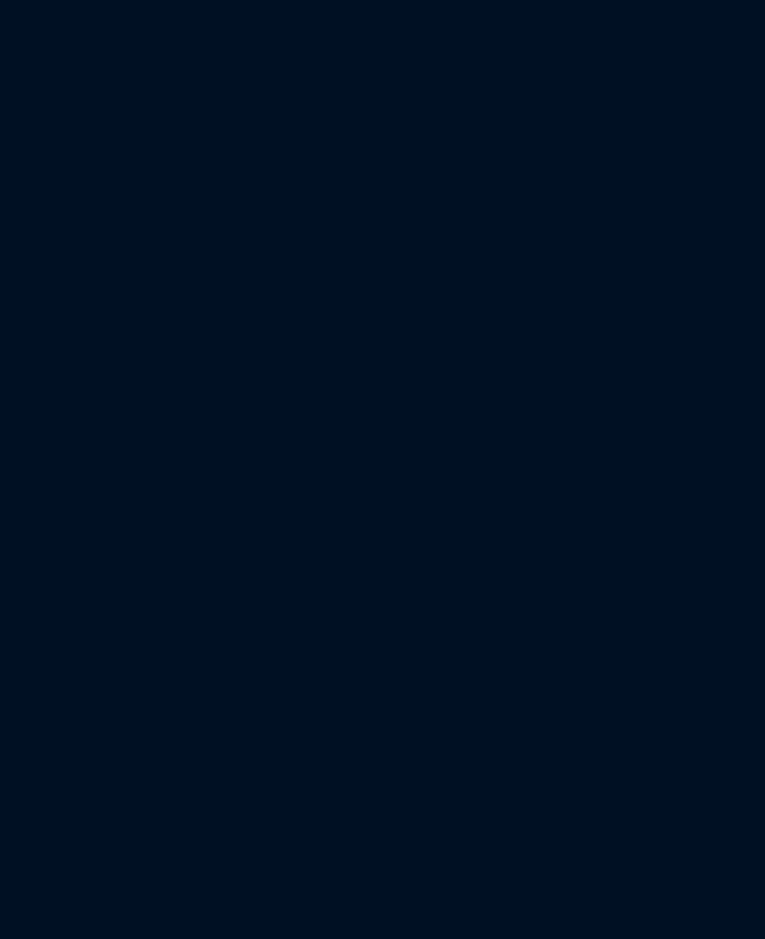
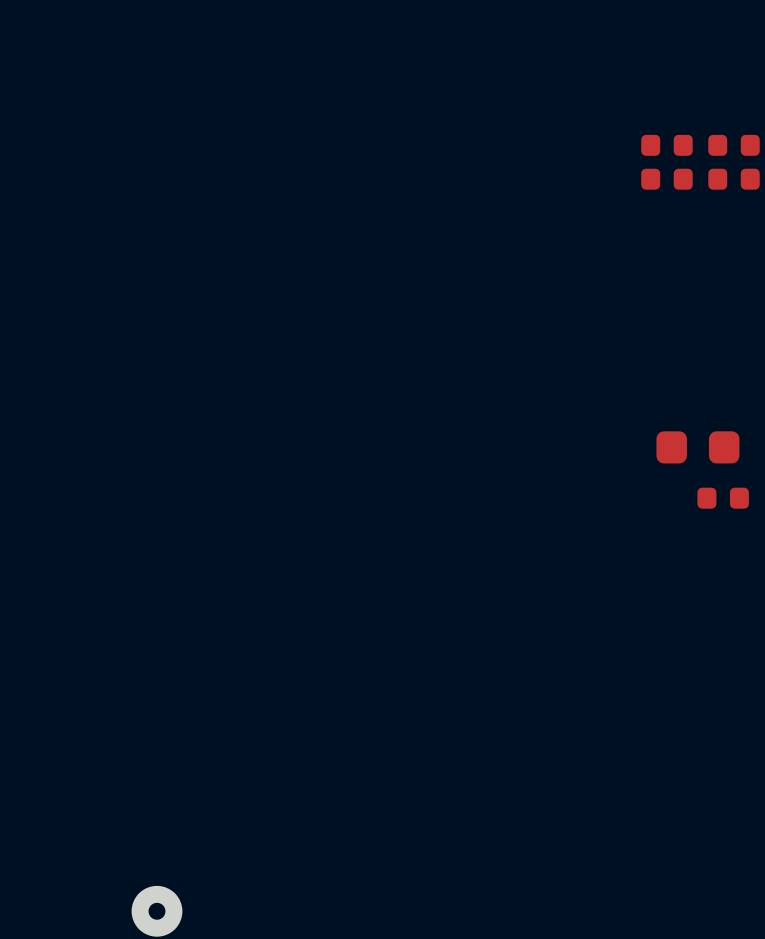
part: none -> (666, 145)
part: none -> (734, 145)
part: none -> (666, 179)
part: none -> (734, 179)
part: none -> (697, 447)
part: none -> (723, 498)
round board edge: none -> [131, 885, 183, 937]

